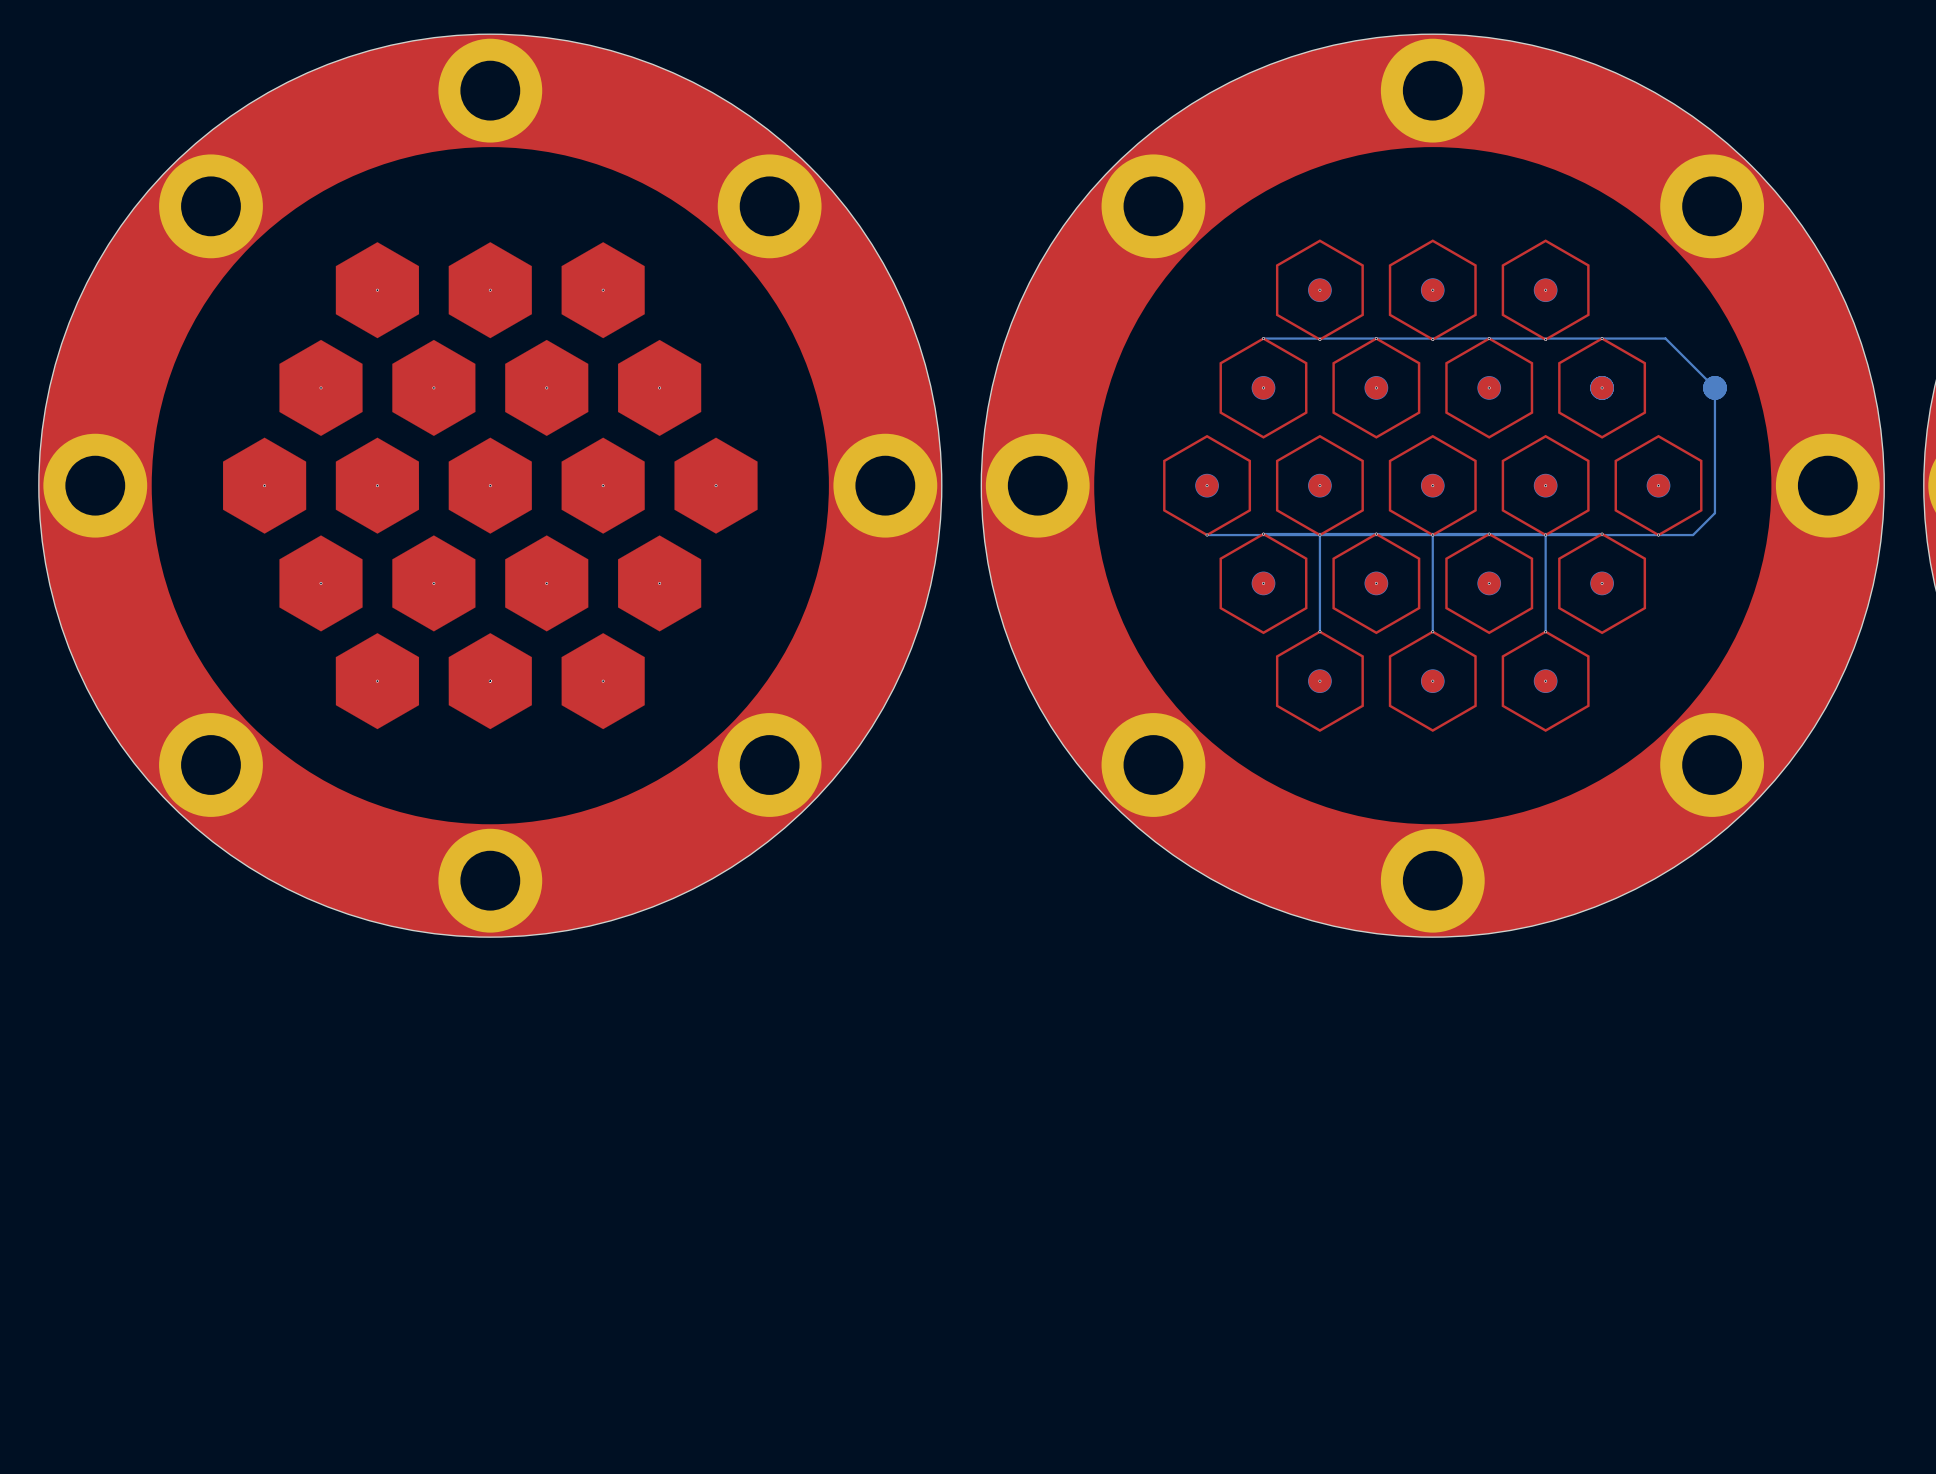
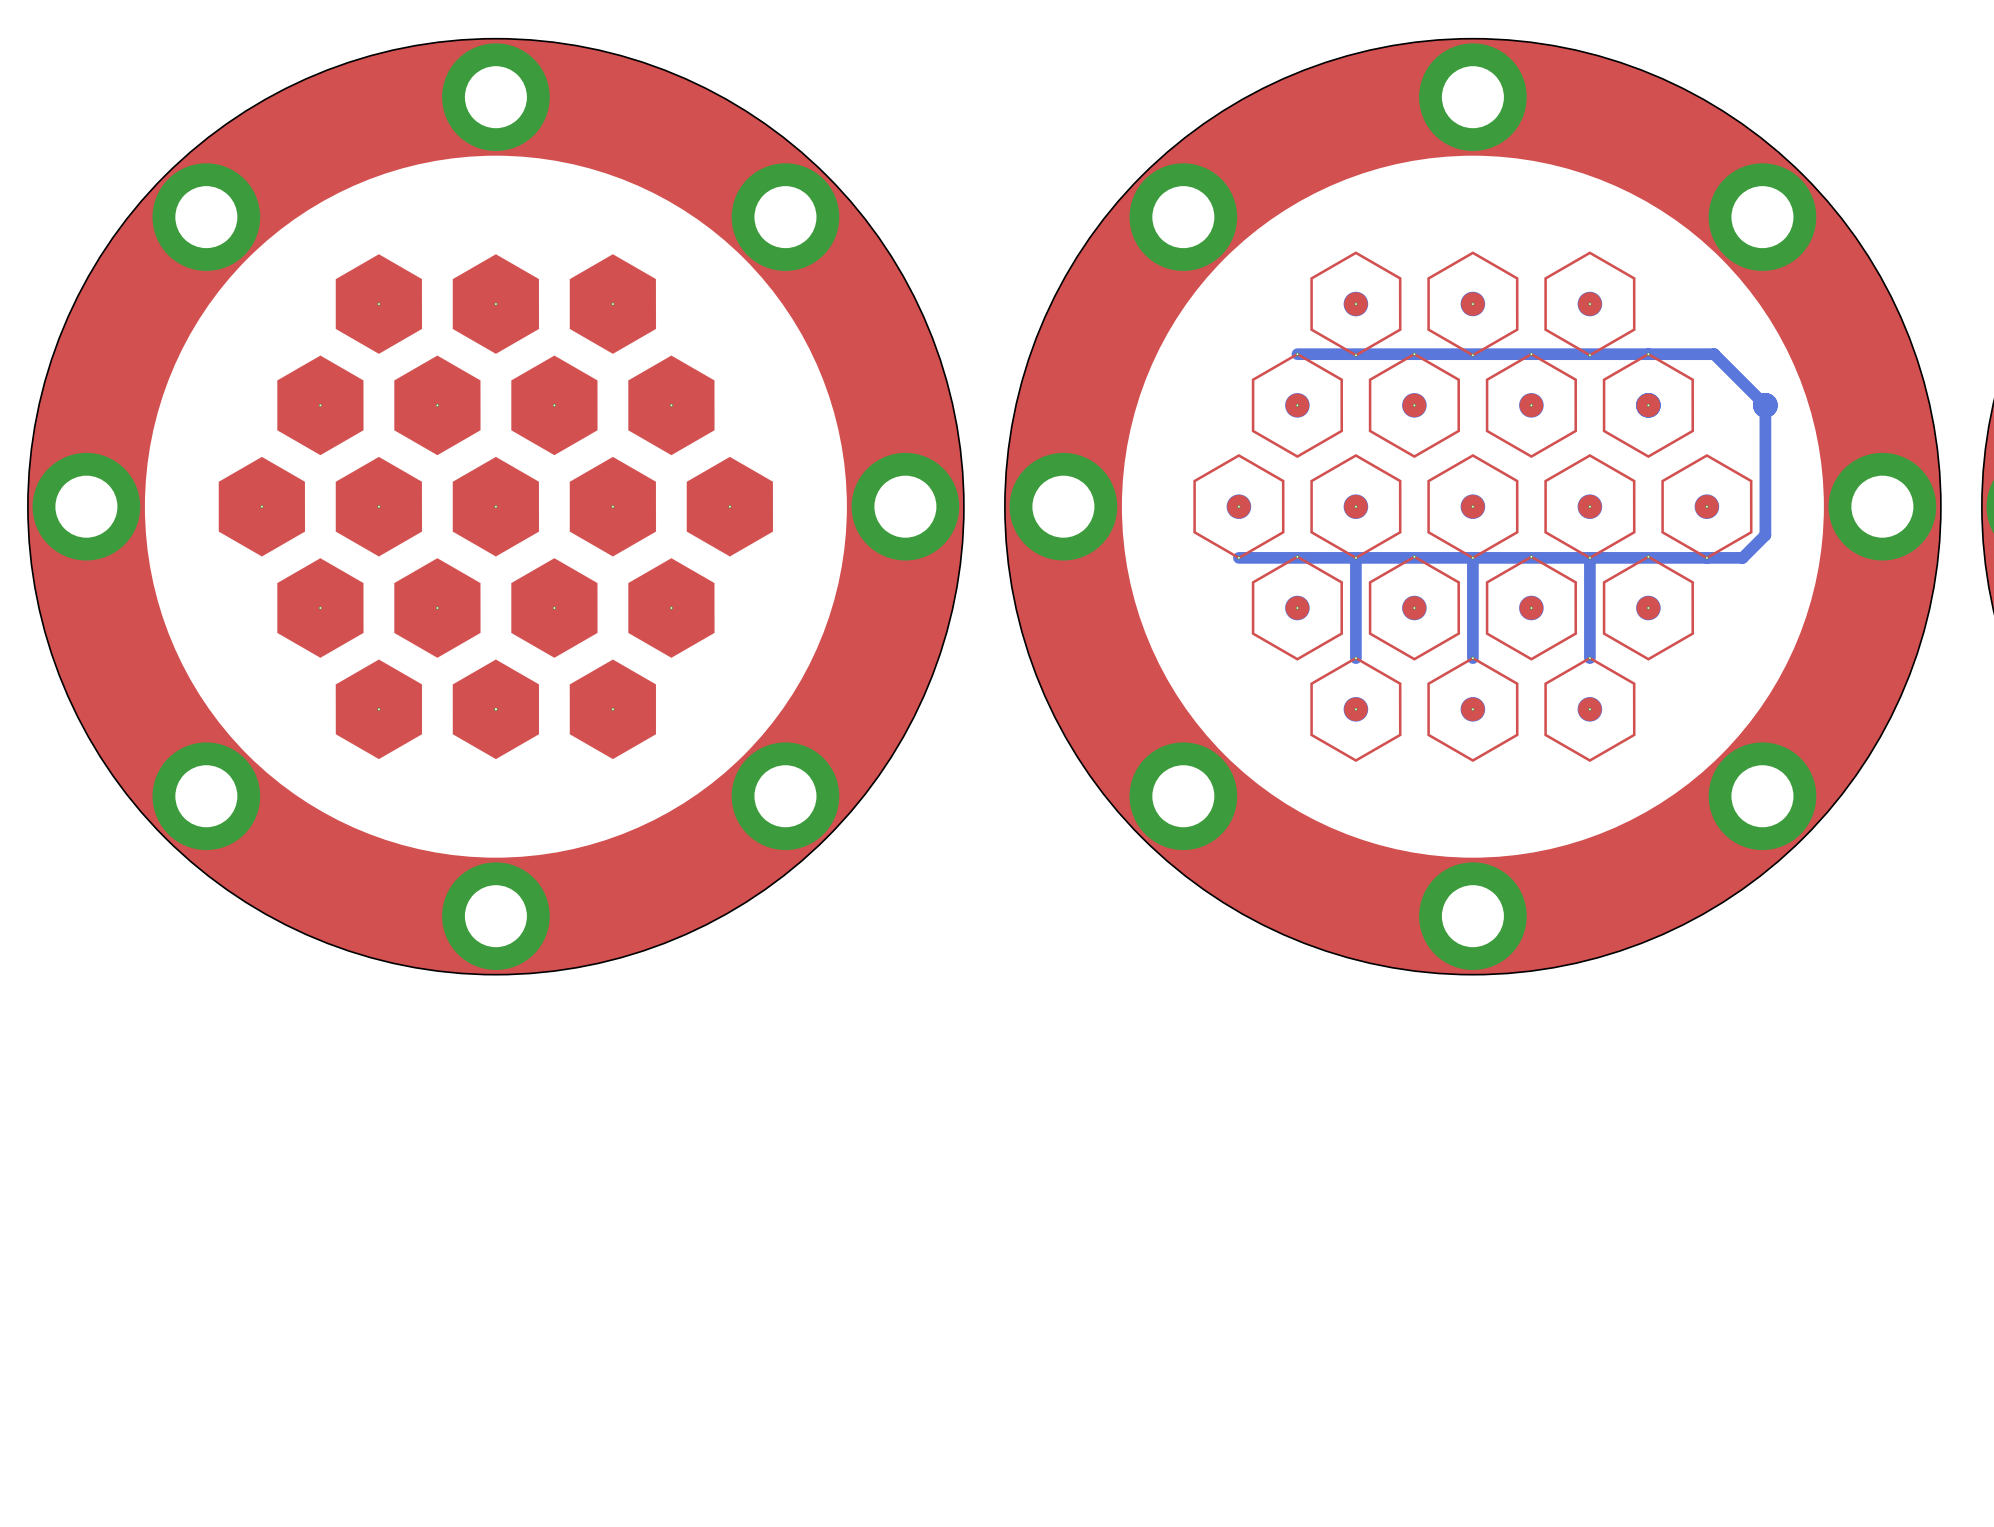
bottom track width: thin (1263, 338) (1665, 338) (1714, 387) (1714, 513) (1693, 535) (1207, 535) -> thick (1297, 354) (1714, 354) (1765, 405) (1765, 535) (1742, 557) (1238, 557)
bottom track width: thin (1319, 535) (1319, 631) -> thick (1355, 557) (1355, 658)
bottom track width: thin (1432, 535) (1432, 631) -> thick (1472, 557) (1472, 658)
bottom track width: thin (1545, 535) (1545, 631) -> thick (1589, 557) (1589, 658)

